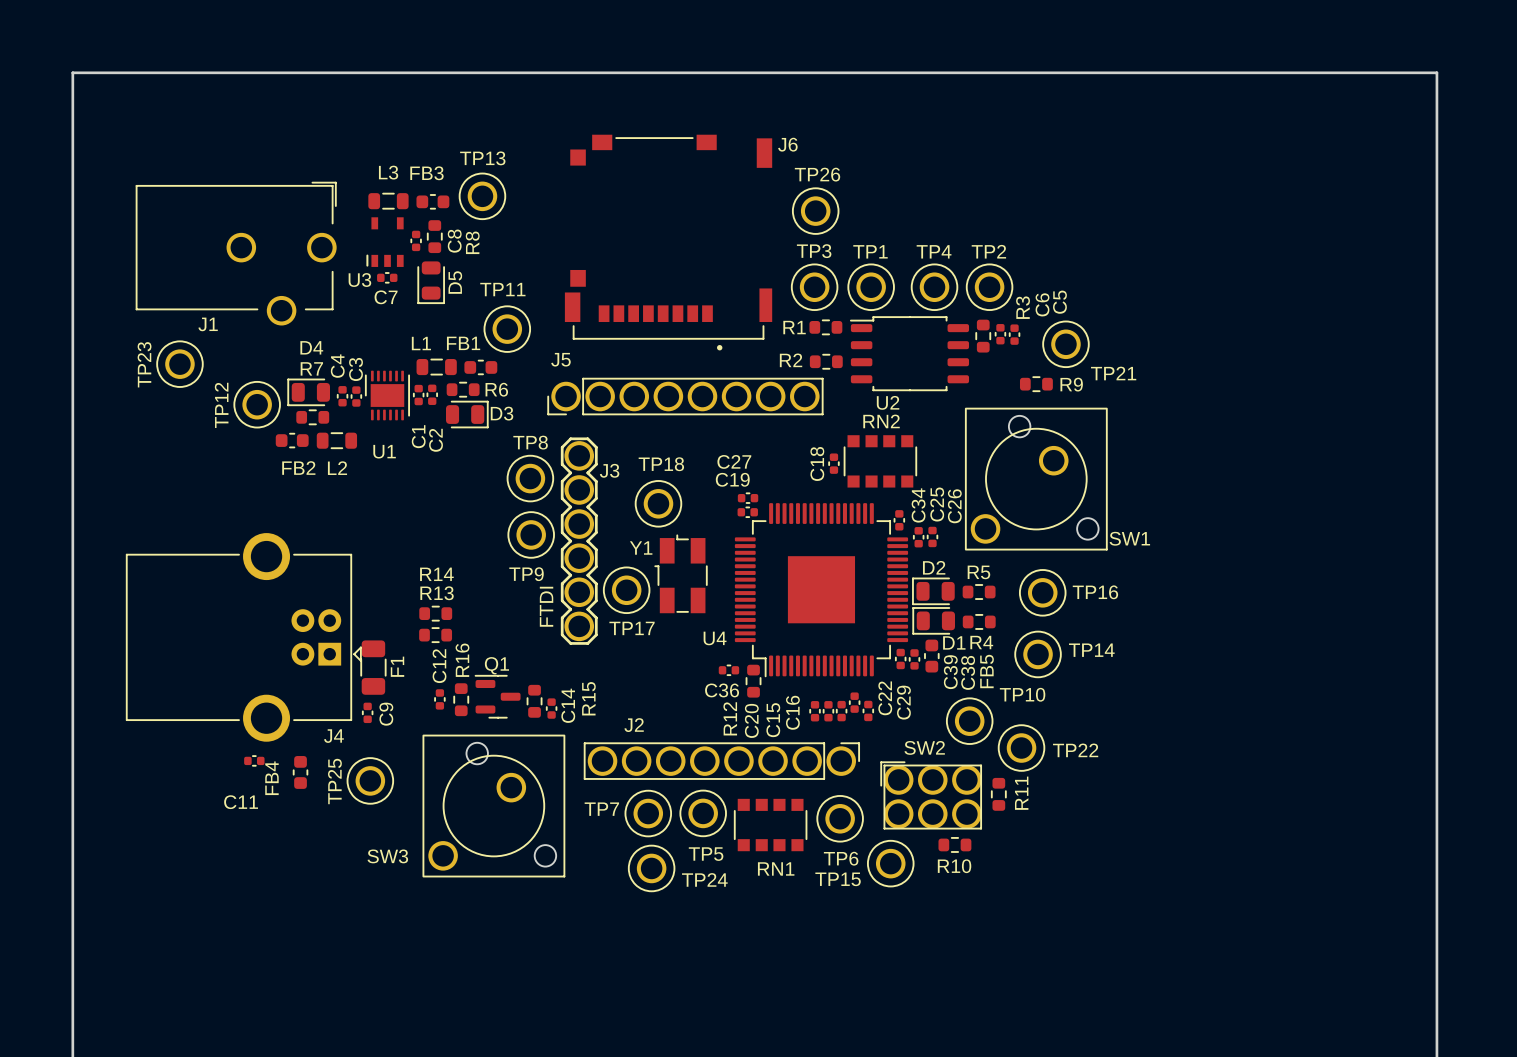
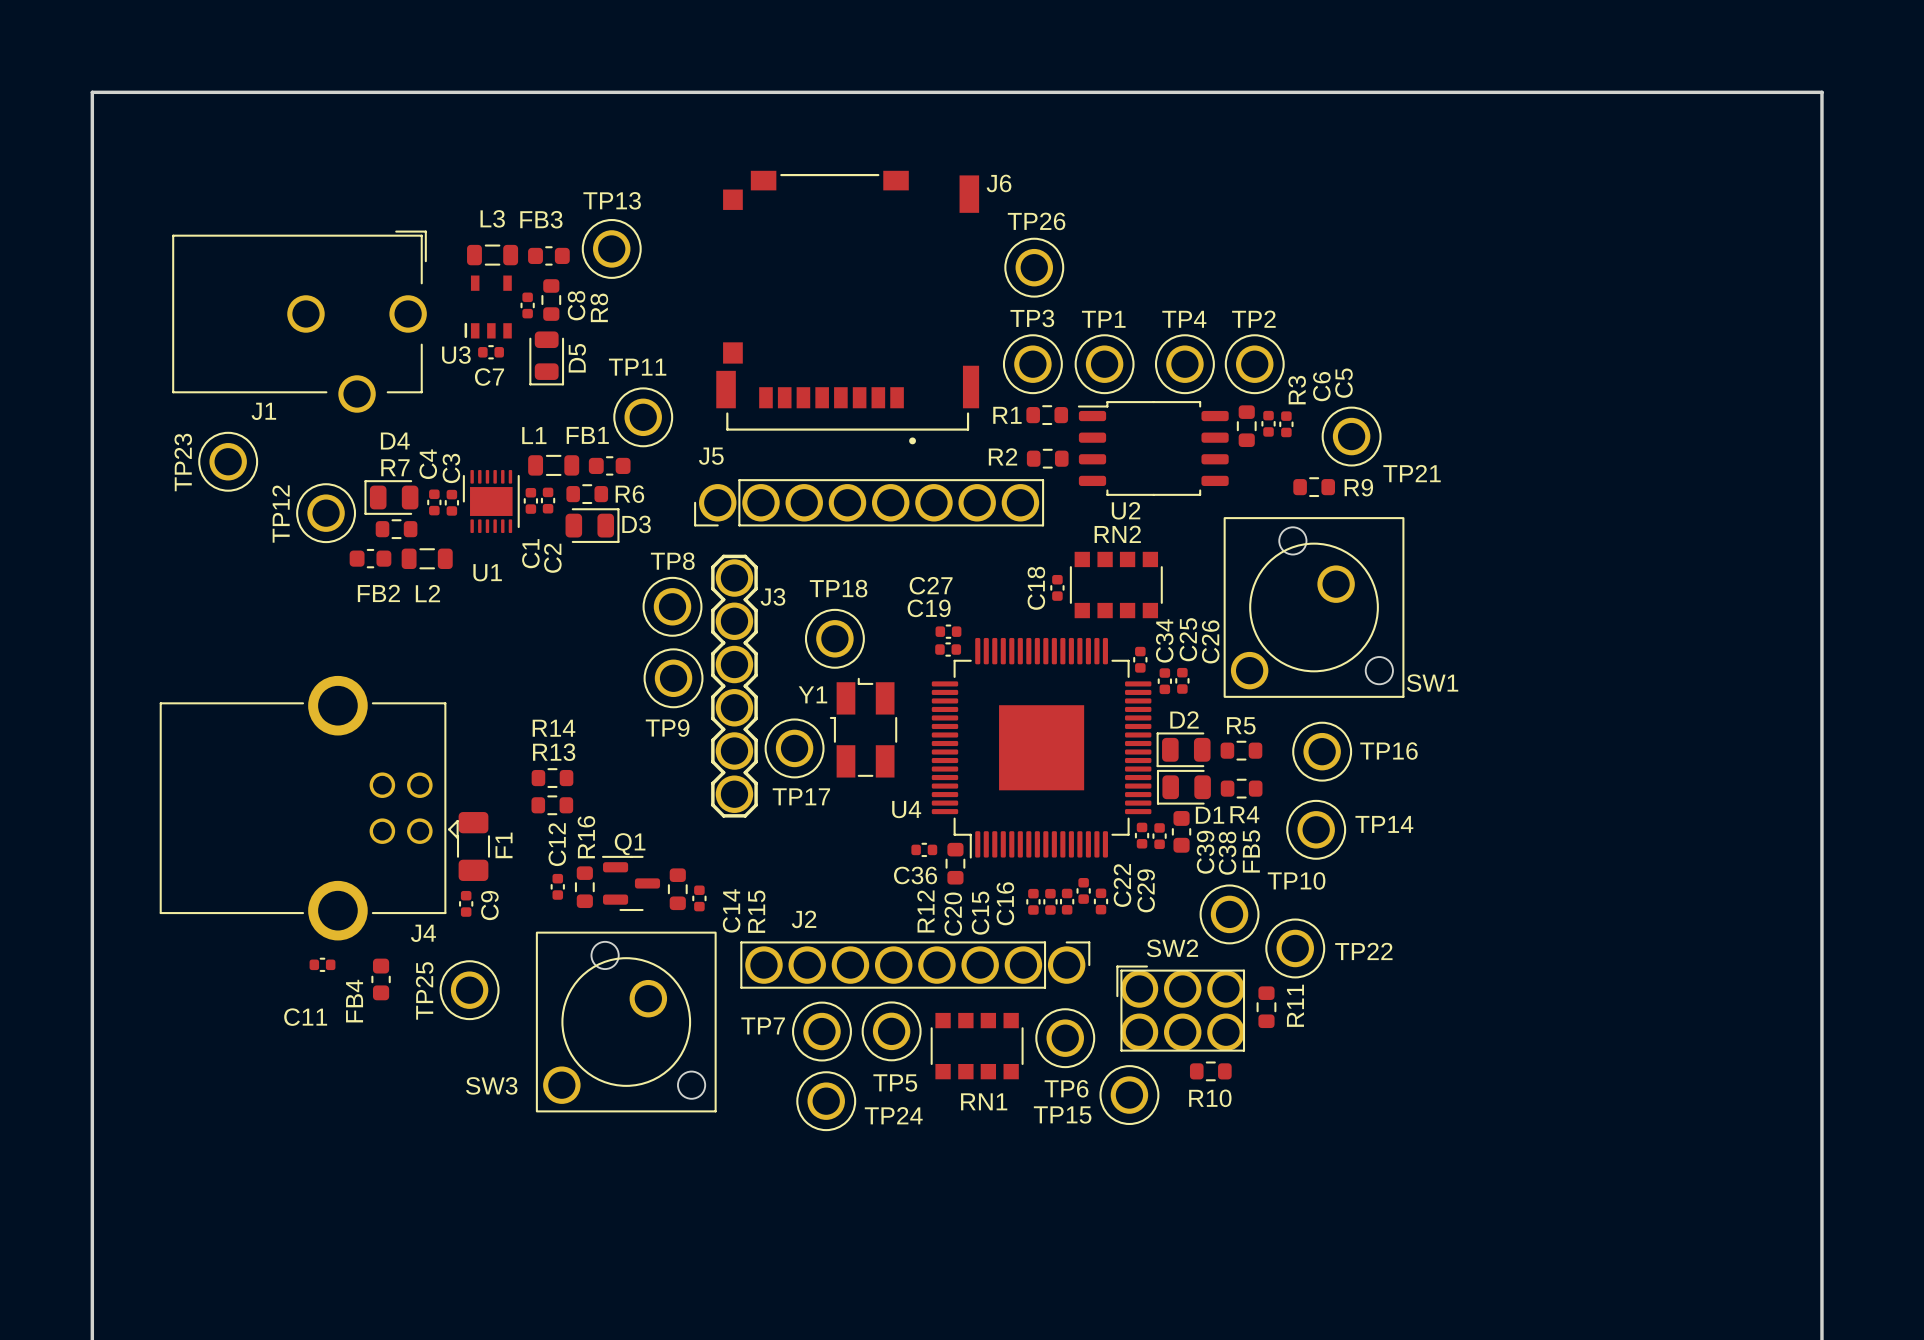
J4 footprint: [125, 533, 362, 742] -> [159, 675, 459, 941]
J3 value: FTDI (546, 606) -> none
R15 name position: R15 (588, 698) -> R15 (756, 911)
C14 name position: C14 (568, 705) -> C14 (731, 910)
FB4 name position: FB4 (271, 778) -> FB4 (354, 1001)

